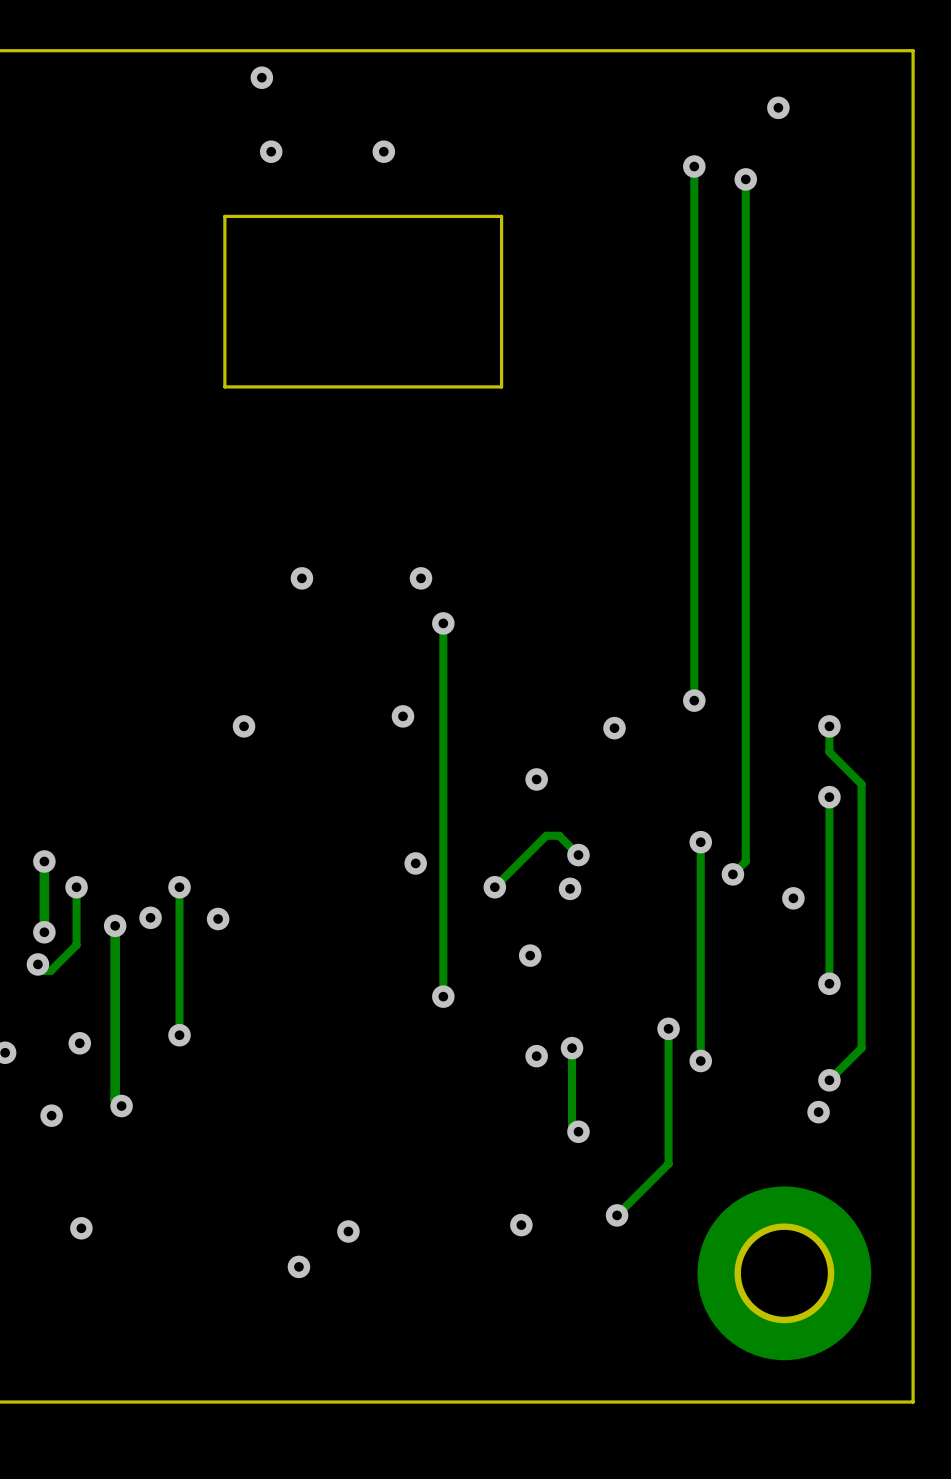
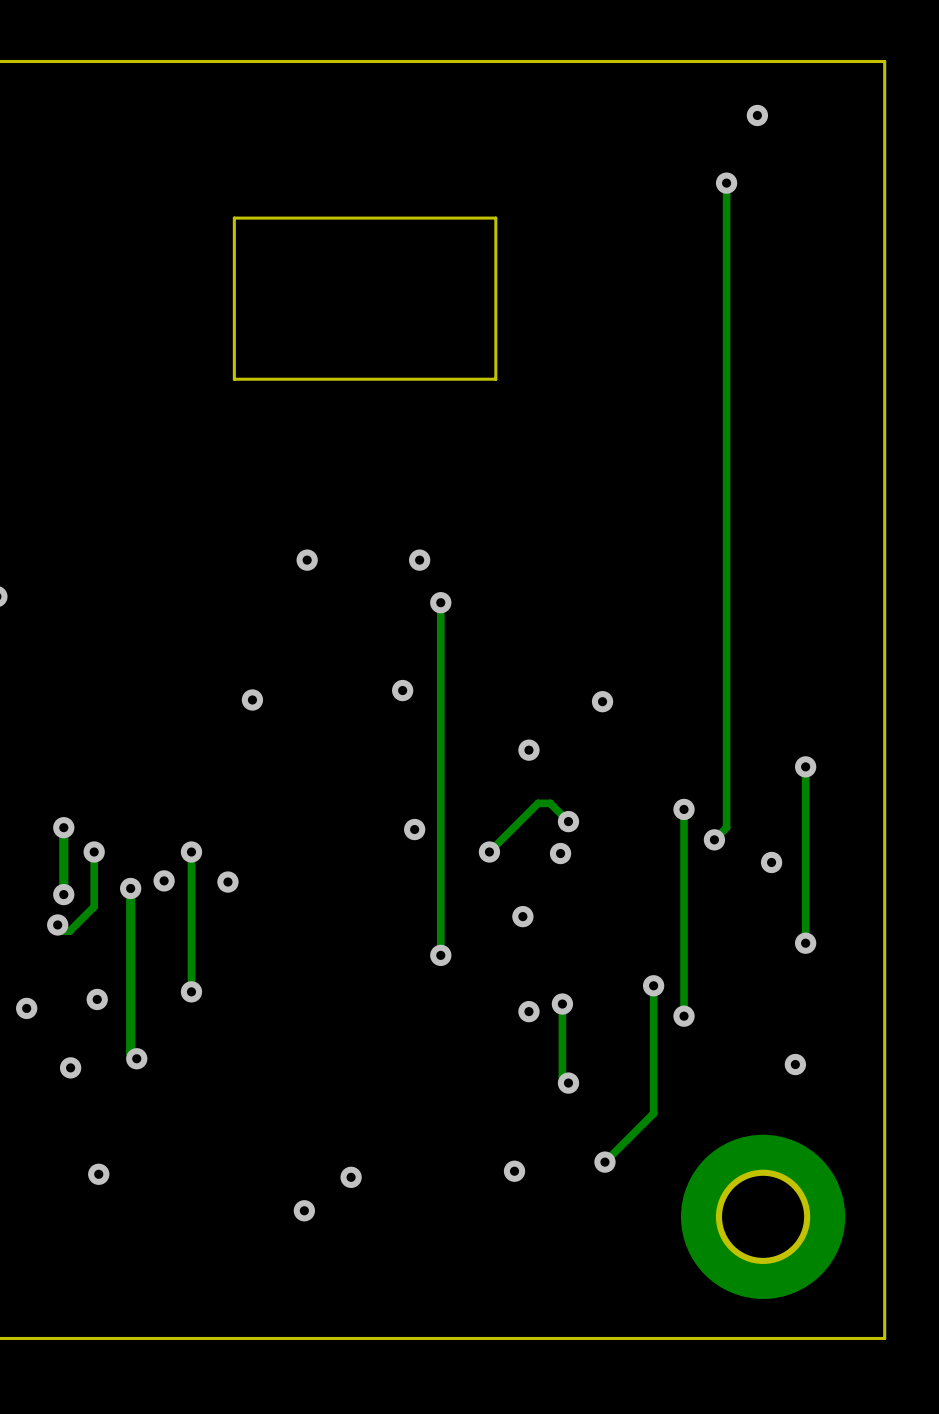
via: (261, 77) -> none
via: (271, 151) -> none
via: (383, 151) -> none
track: (694, 166) (694, 700) -> none
via: (694, 166) -> none
via: (694, 700) -> none
track: (829, 726) (829, 752) (861, 784) (861, 1048) (829, 1080) -> none
via: (829, 726) -> none
via: (829, 1080) -> none

